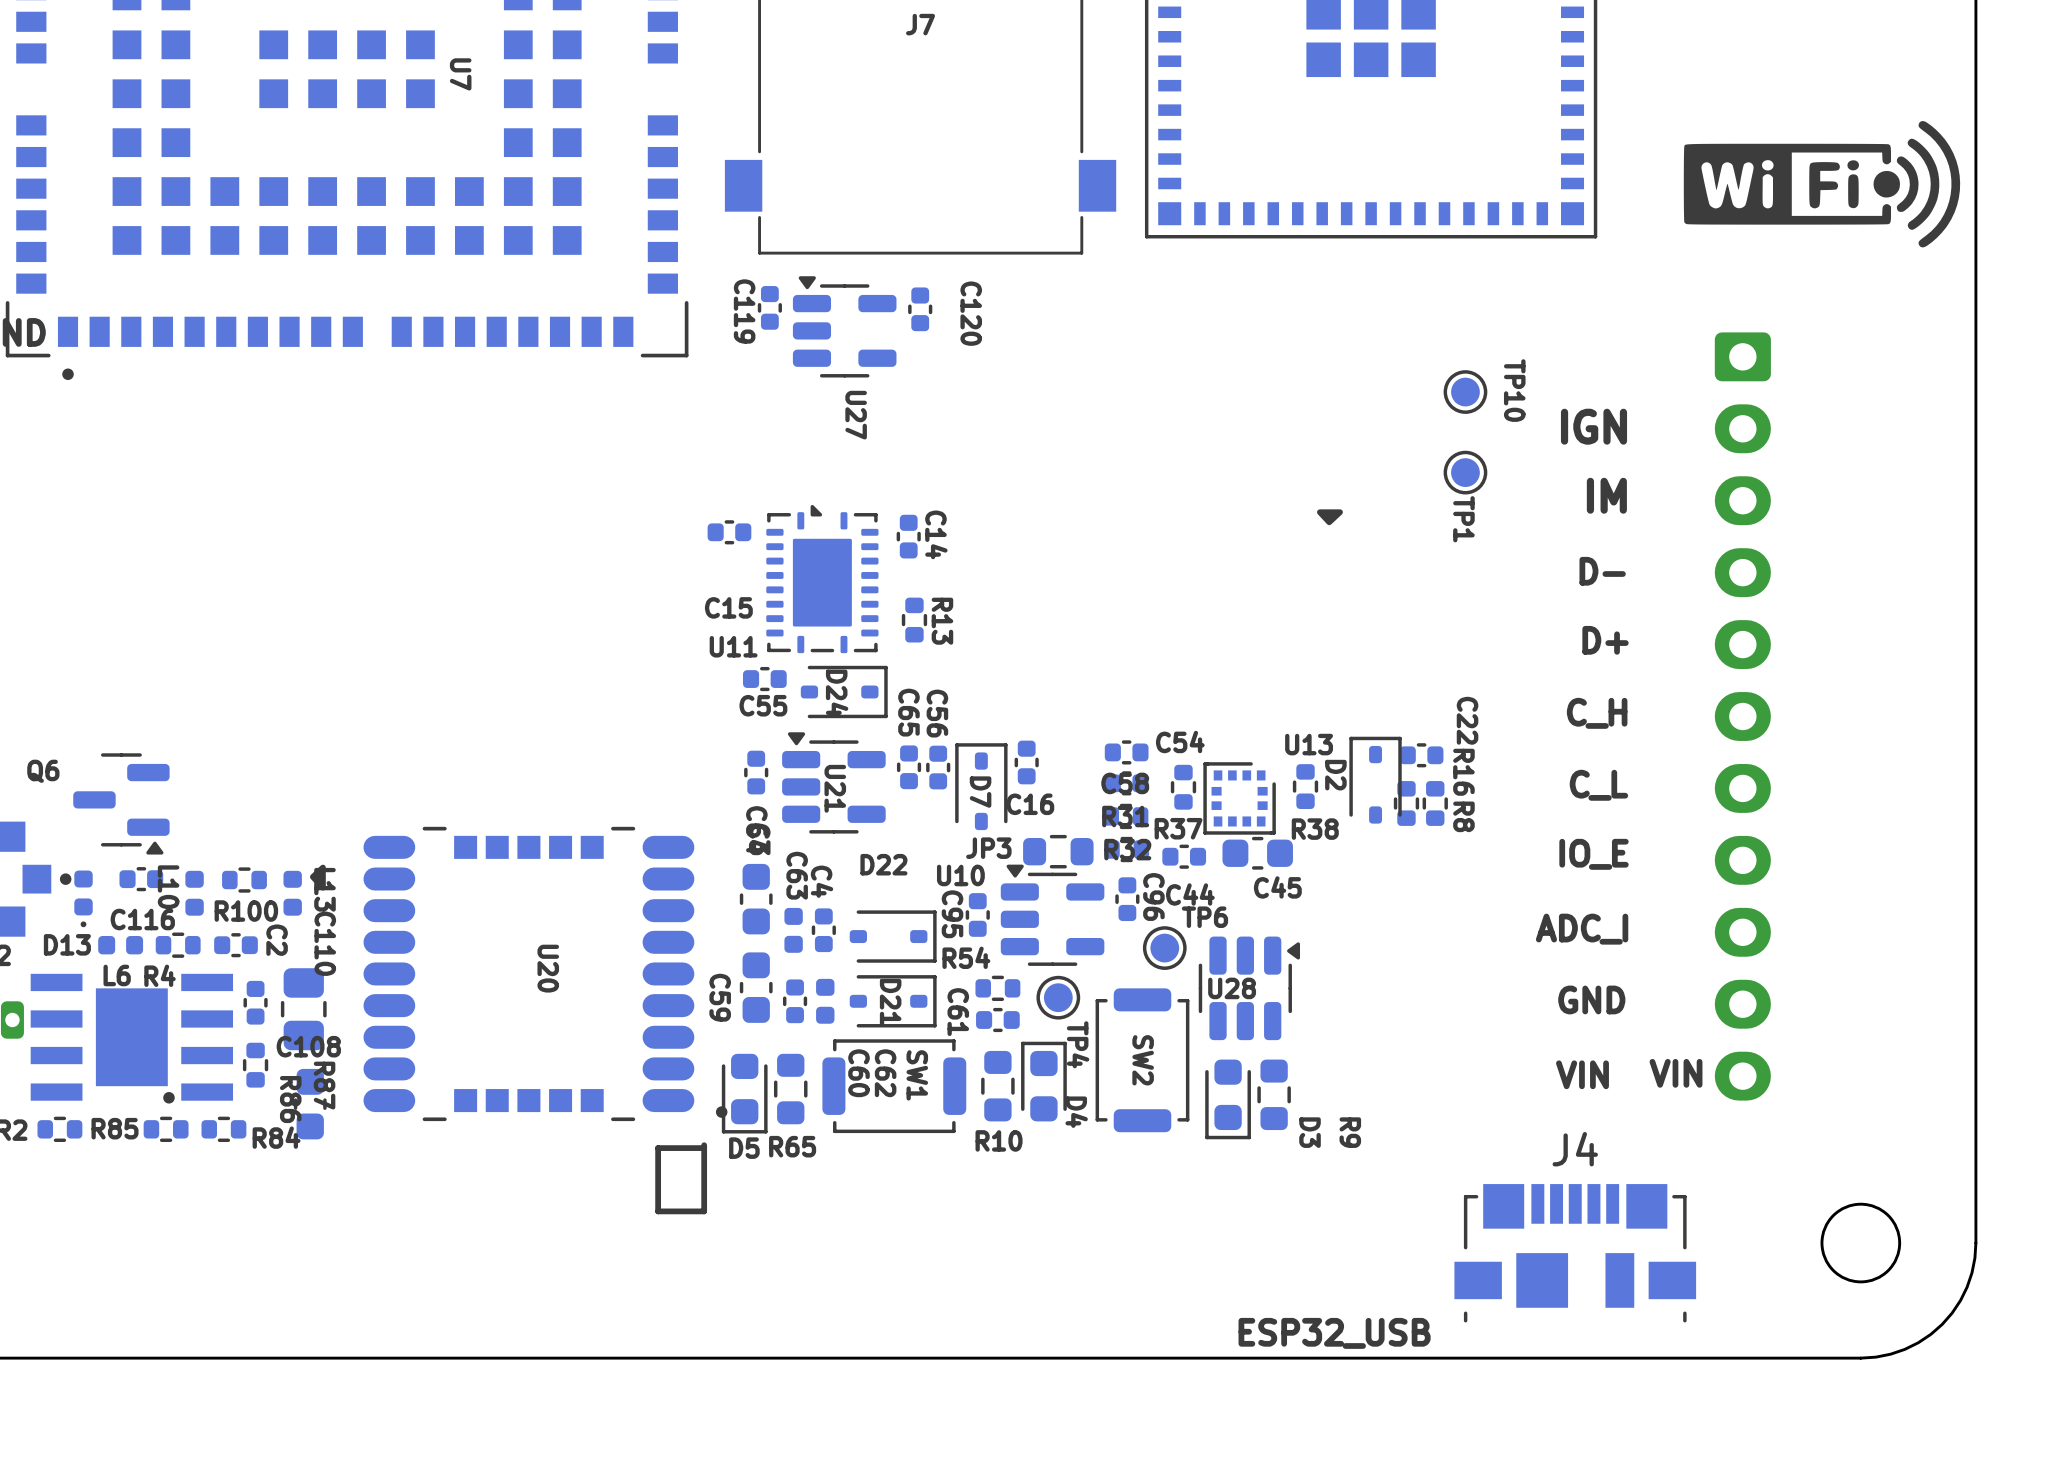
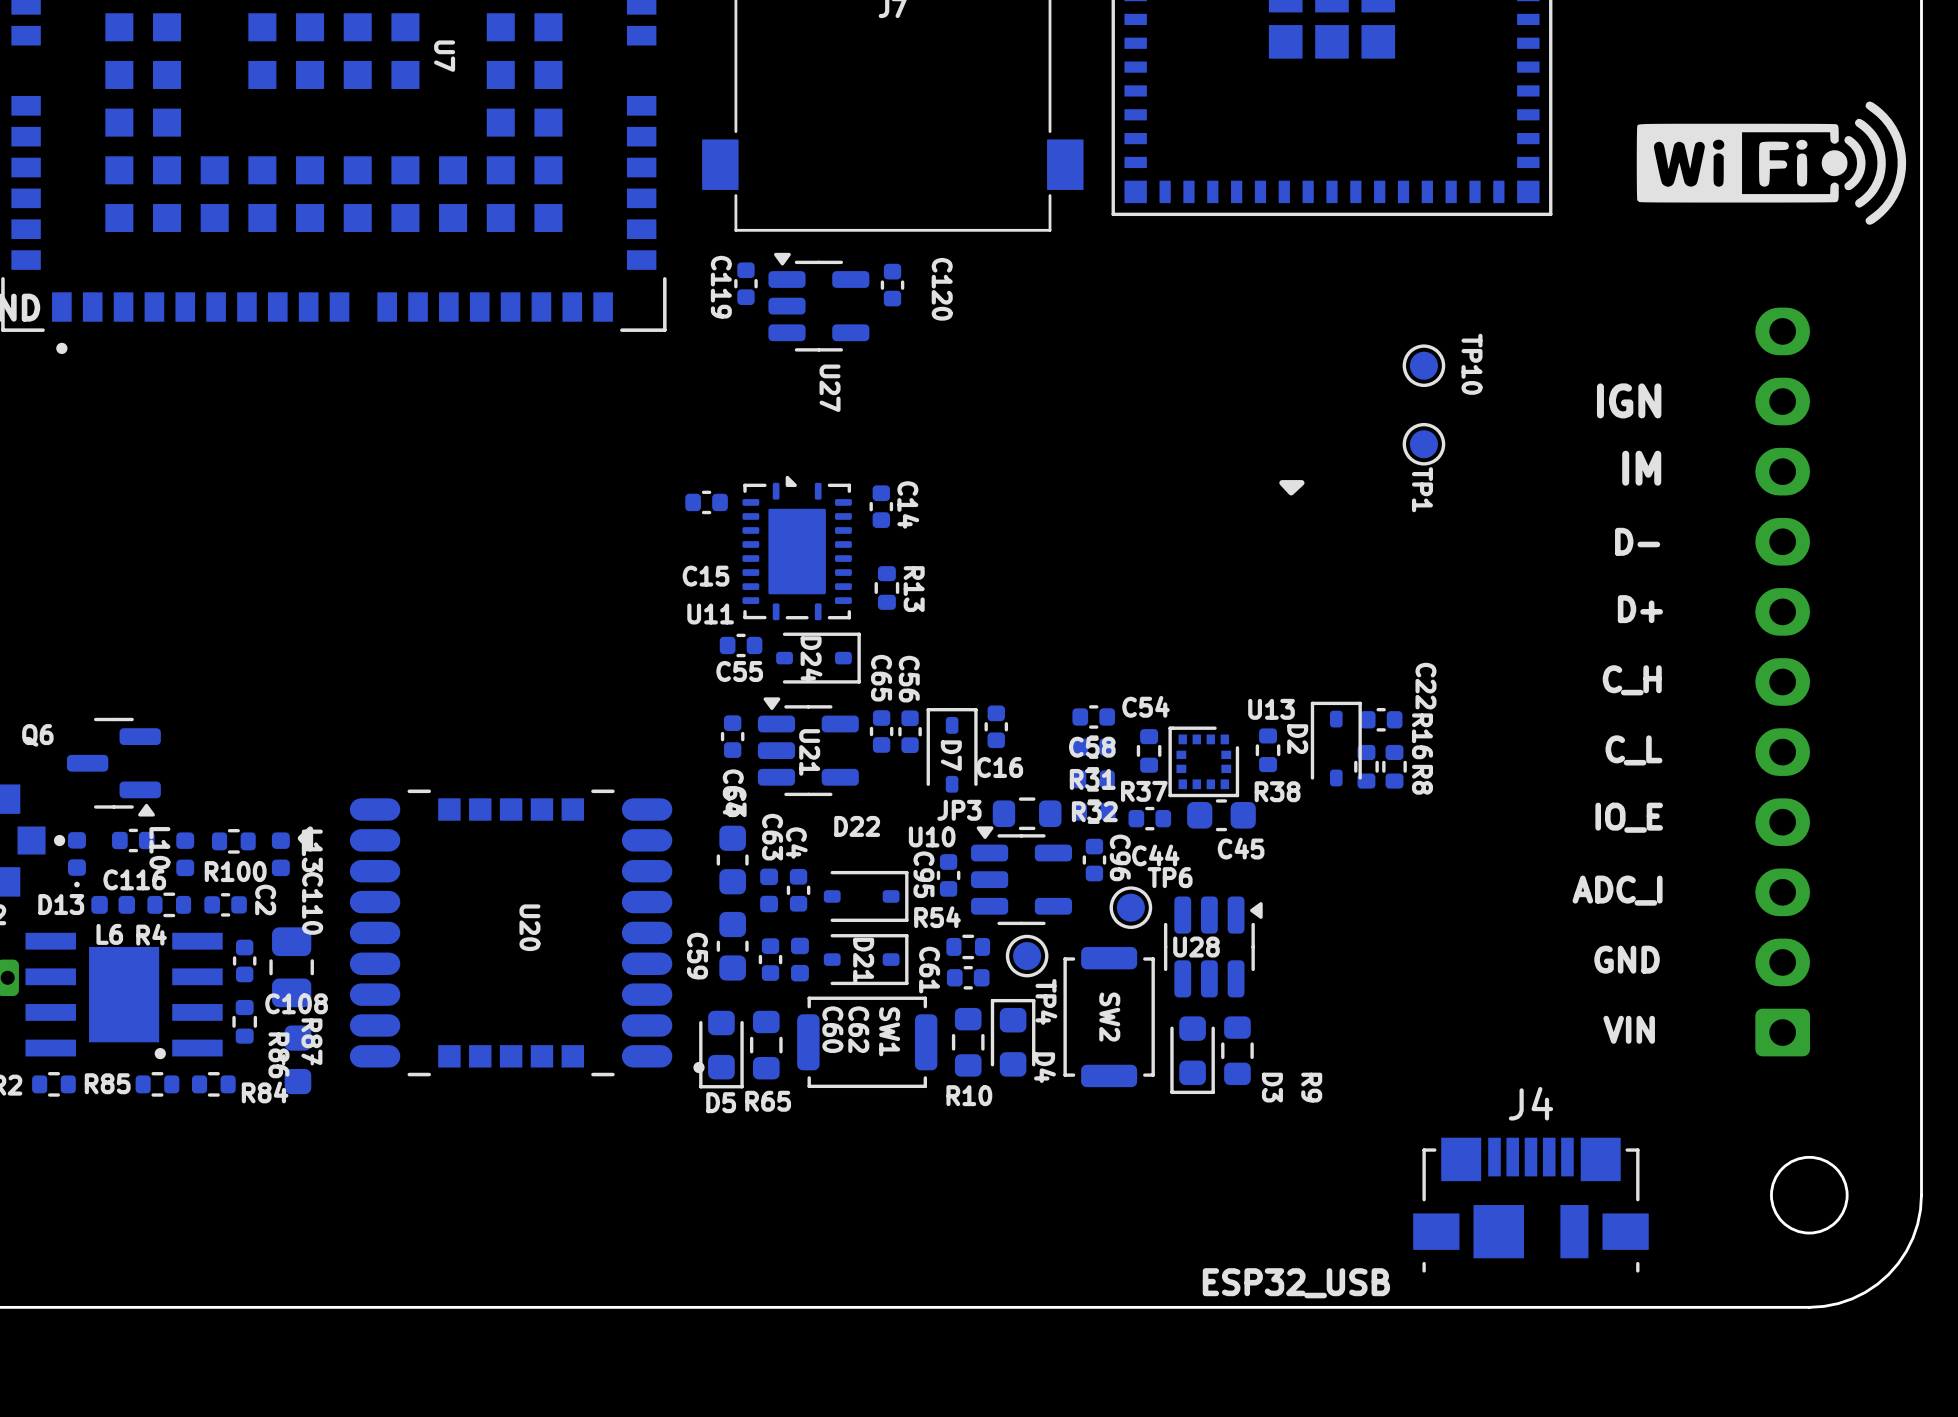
text position: IGN (1593, 426) -> IGN (1629, 400)
text position: IM (1606, 495) -> IM (1641, 468)
text position: D- (1602, 571) -> D- (1637, 541)
text position: D+ (1605, 640) -> D+ (1640, 609)
text position: C_H (1597, 713) -> C_H (1632, 680)
part rotation: 0° (1742, 716) -> 180° (1782, 681)
text position: C_L (1598, 785) -> C_L (1633, 750)
text position: IO_E (1594, 854) -> IO_E (1629, 817)
text position: ADC_I (1582, 929) -> ADC_I (1617, 890)
text position: GND (1591, 999) -> GND (1627, 959)
text: VIN (1582, 1074) -> none
line: (704, 1145) (704, 1211) (658, 1211) (658, 1148) (704, 1148) -> none

